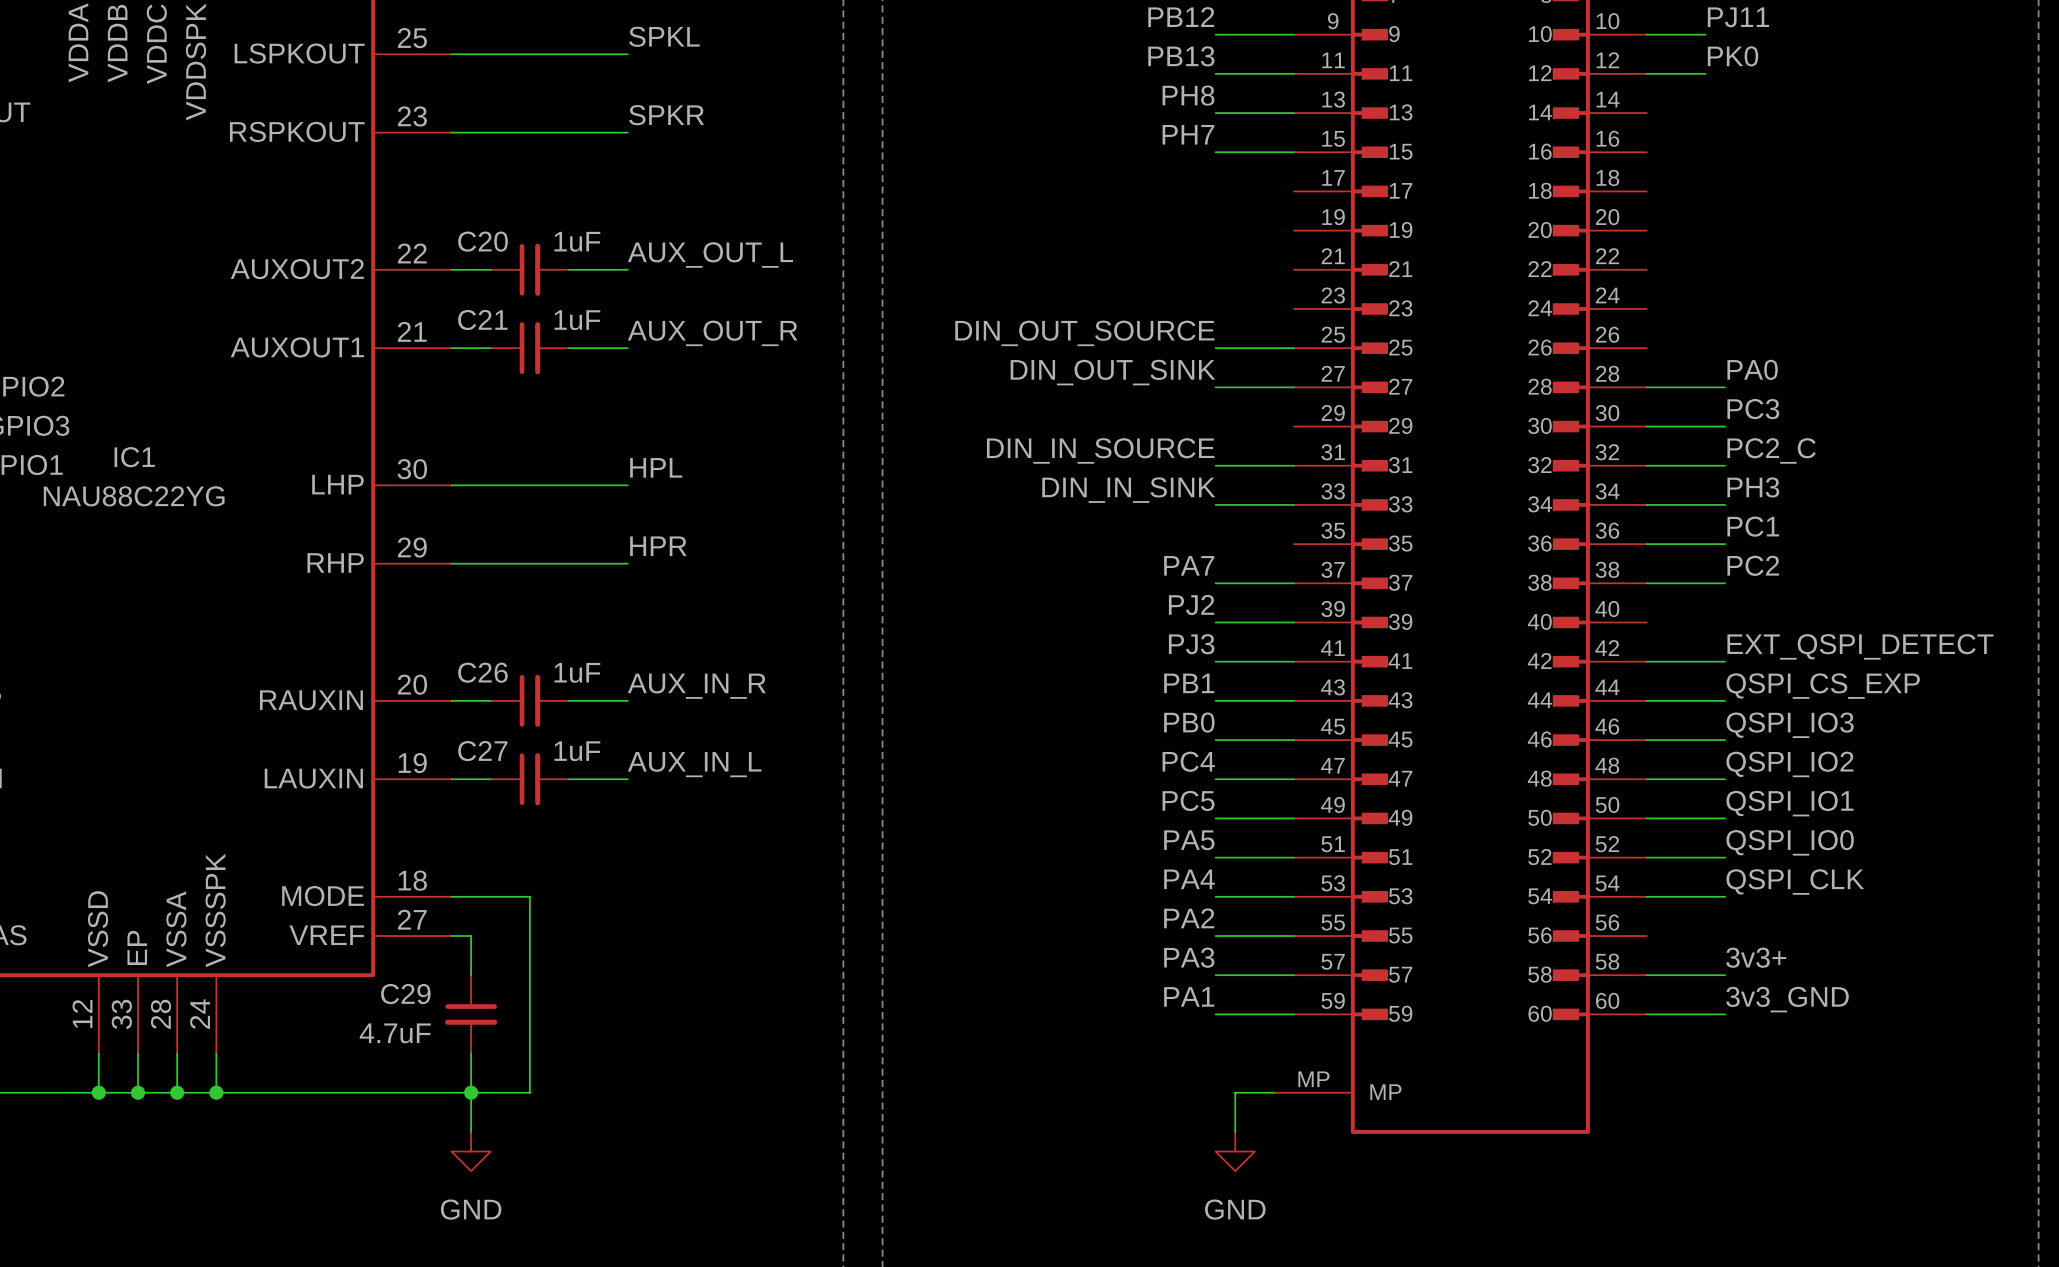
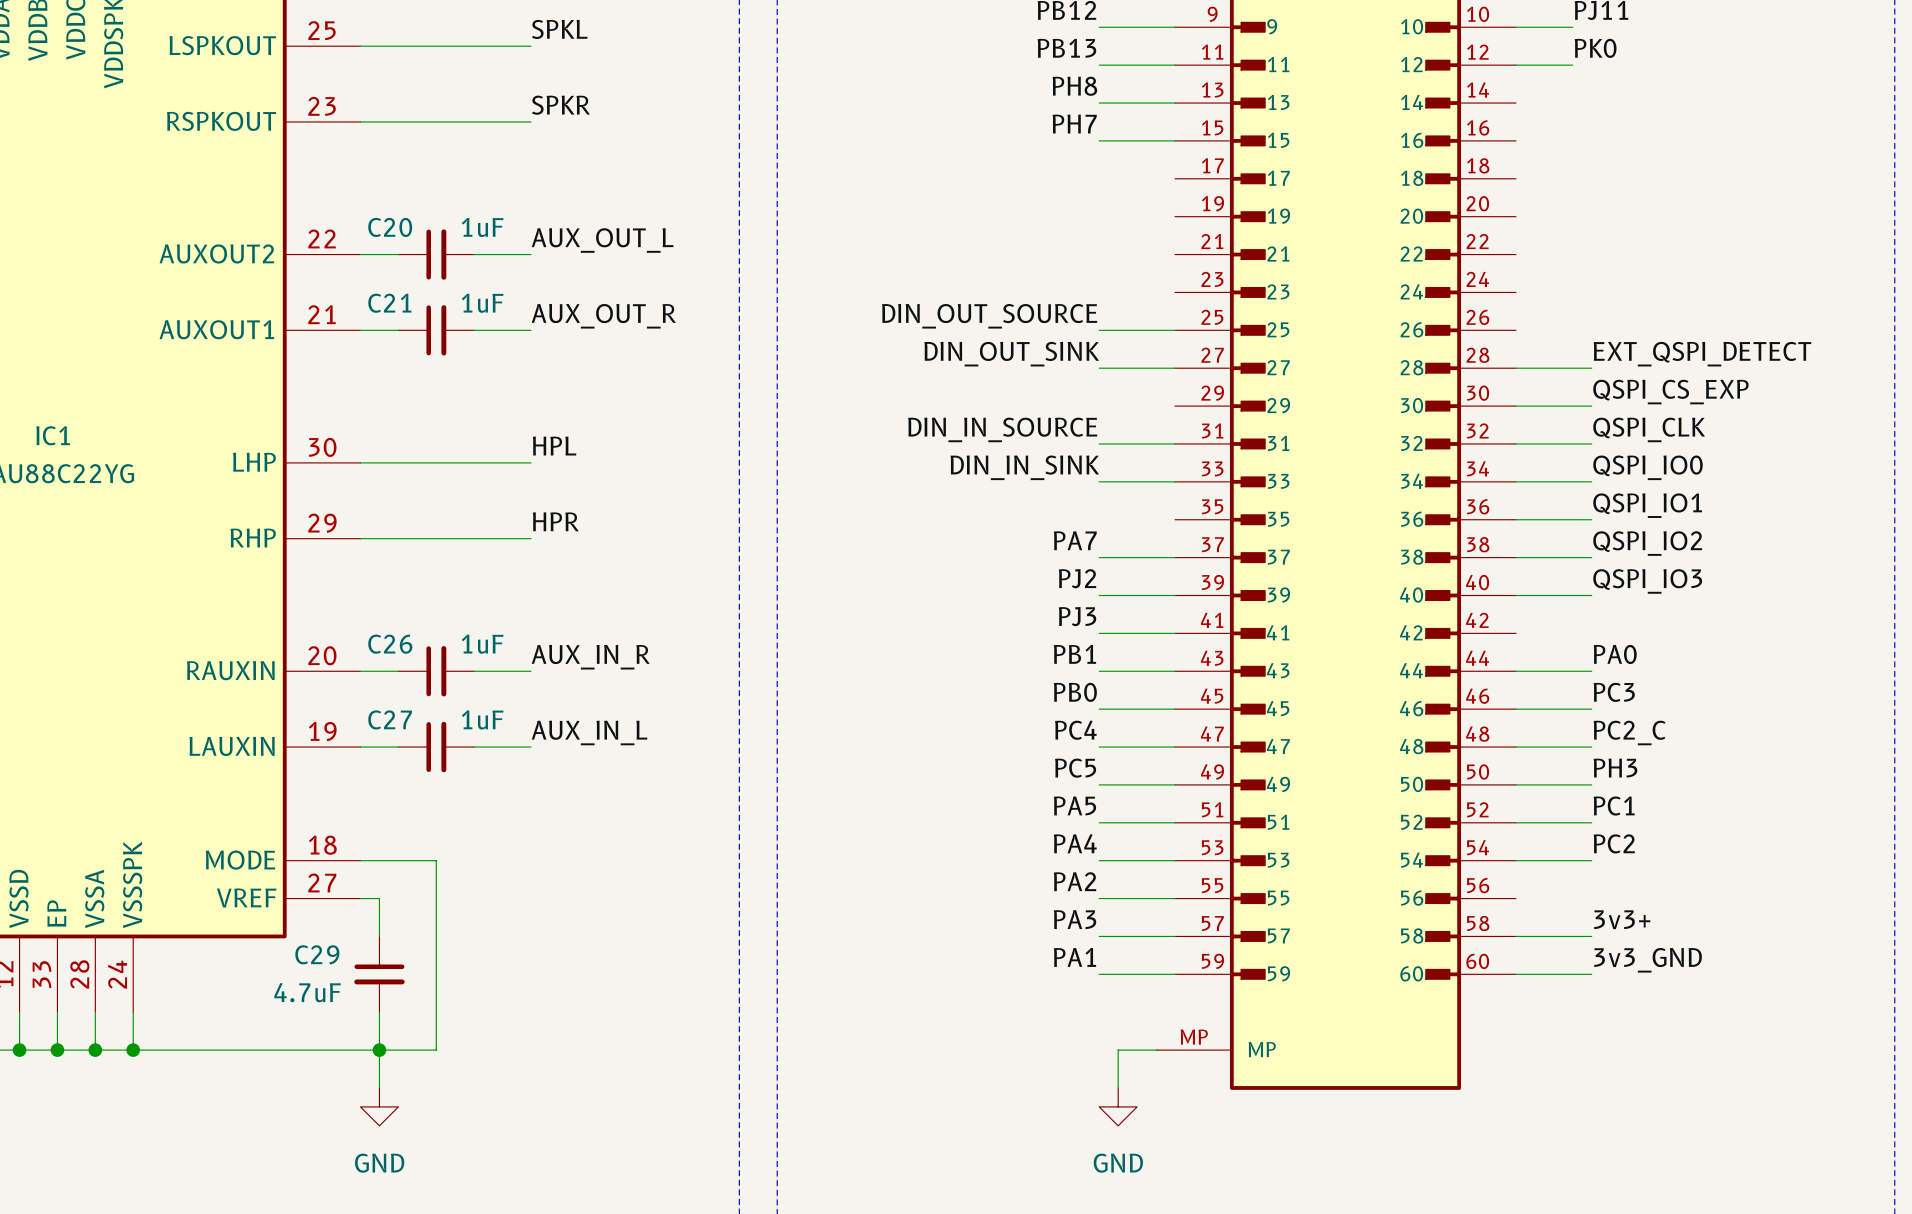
label: PA0 (1752, 369) -> EXT_QSPI_DETECT (1702, 354)
label: PC3 (1753, 409) -> QSPI_CS_EXP (1670, 392)
label: PC2_C (1771, 450) -> QSPI_CLK (1649, 429)
label: PH3 (1753, 487) -> QSPI_IO0 (1647, 467)
label: PC1 (1753, 526) -> QSPI_IO1 (1647, 505)
label: PC2 (1753, 565) -> QSPI_IO2 (1647, 543)
label: none -> QSPI_IO3 (1647, 581)
label: EXT_QSPI_DETECT (1860, 646) -> none
wire: (1646, 661) (1725, 661) -> (1515, 595) (1591, 595)
label: QSPI_CS_EXP (1823, 686) -> PA0 (1615, 654)
label: QSPI_IO3 (1790, 725) -> PC3 (1614, 692)
label: QSPI_IO2 (1789, 764) -> PC2_C (1629, 732)
label: QSPI_IO1 (1789, 803) -> PH3 (1615, 768)
label: QSPI_IO0 (1790, 842) -> PC1 (1614, 806)
label: QSPI_CLK (1795, 882) -> PC2 (1614, 843)

